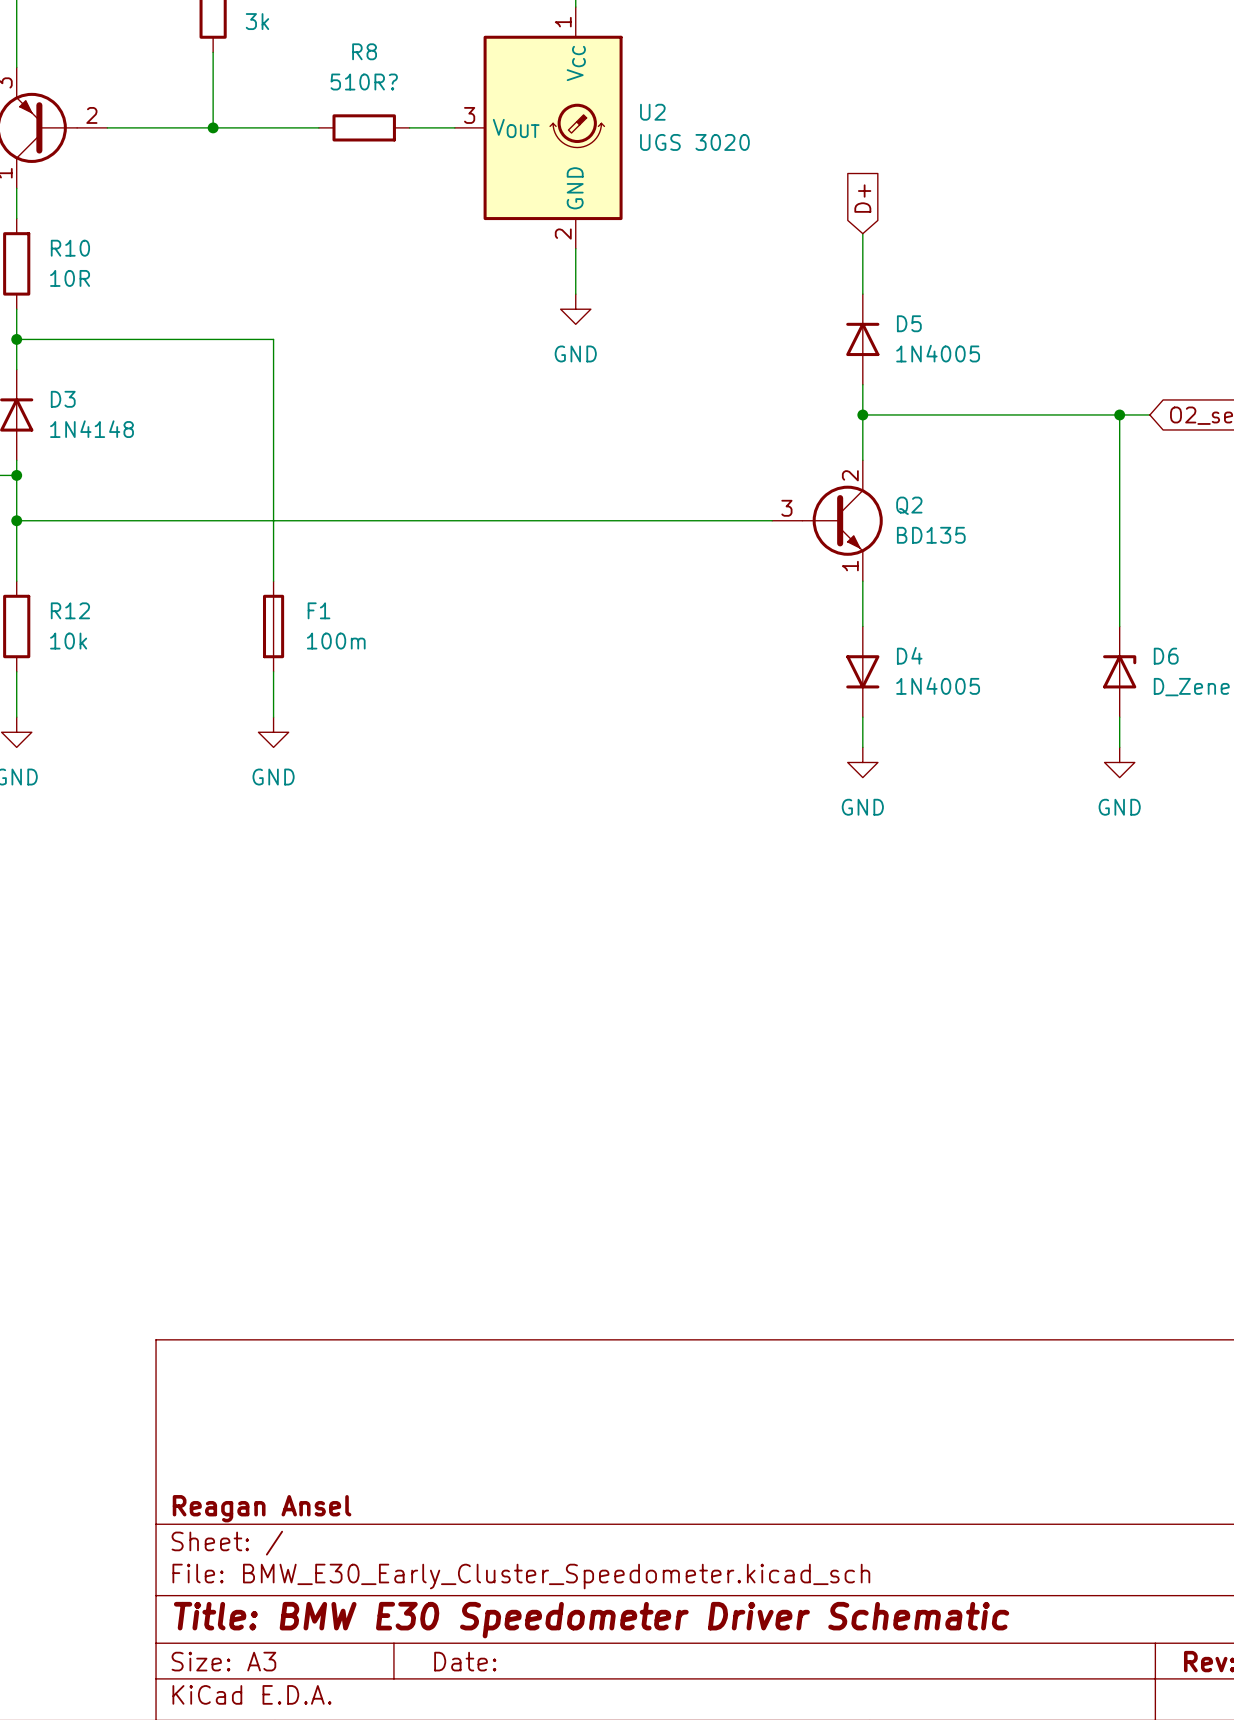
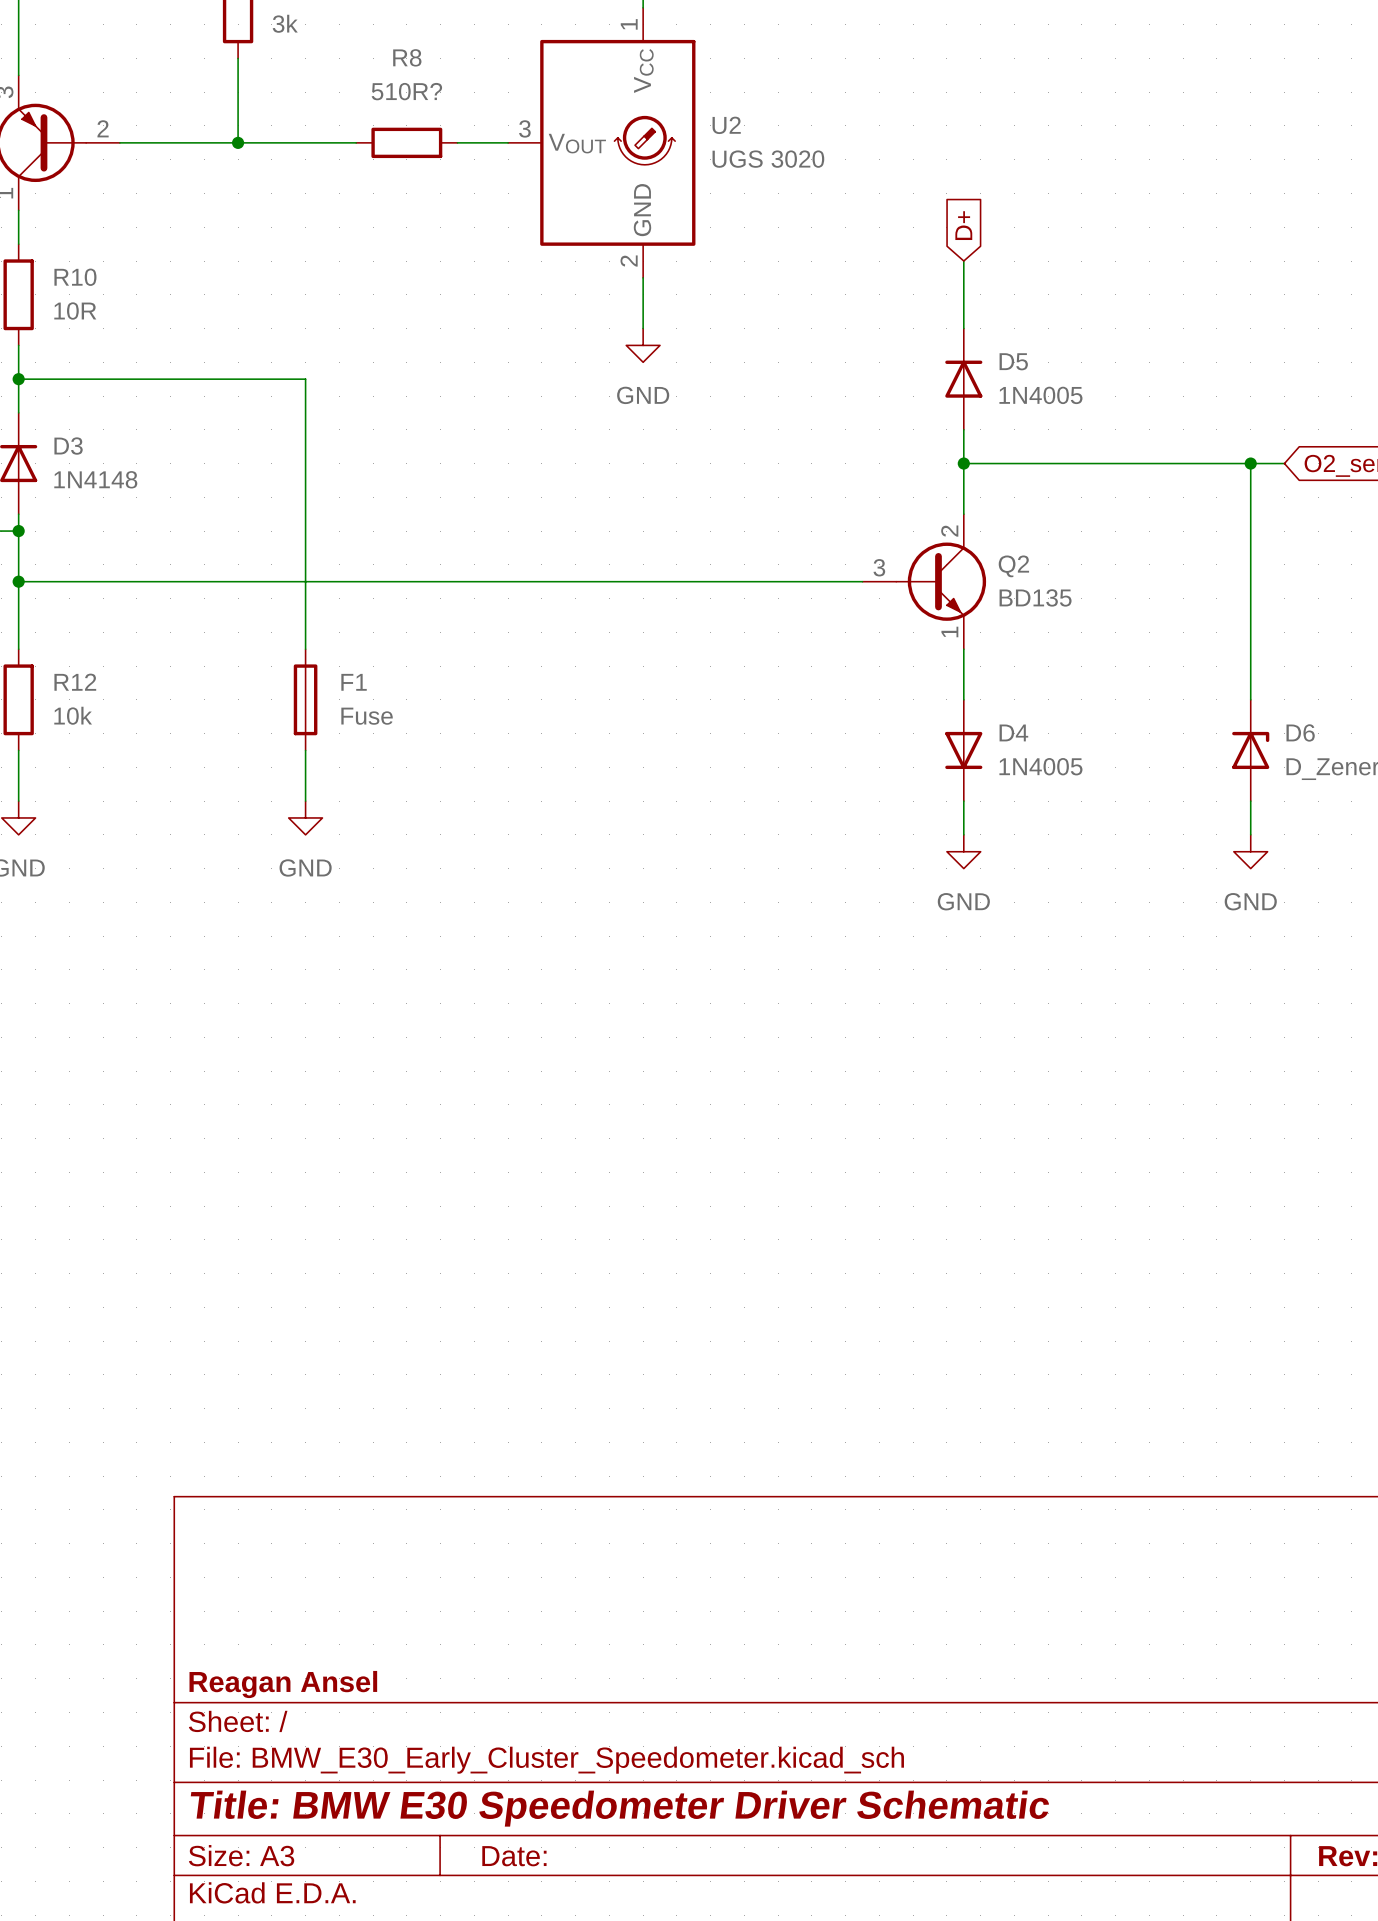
F1 value: 100m (336, 641) -> Fuse (367, 716)

